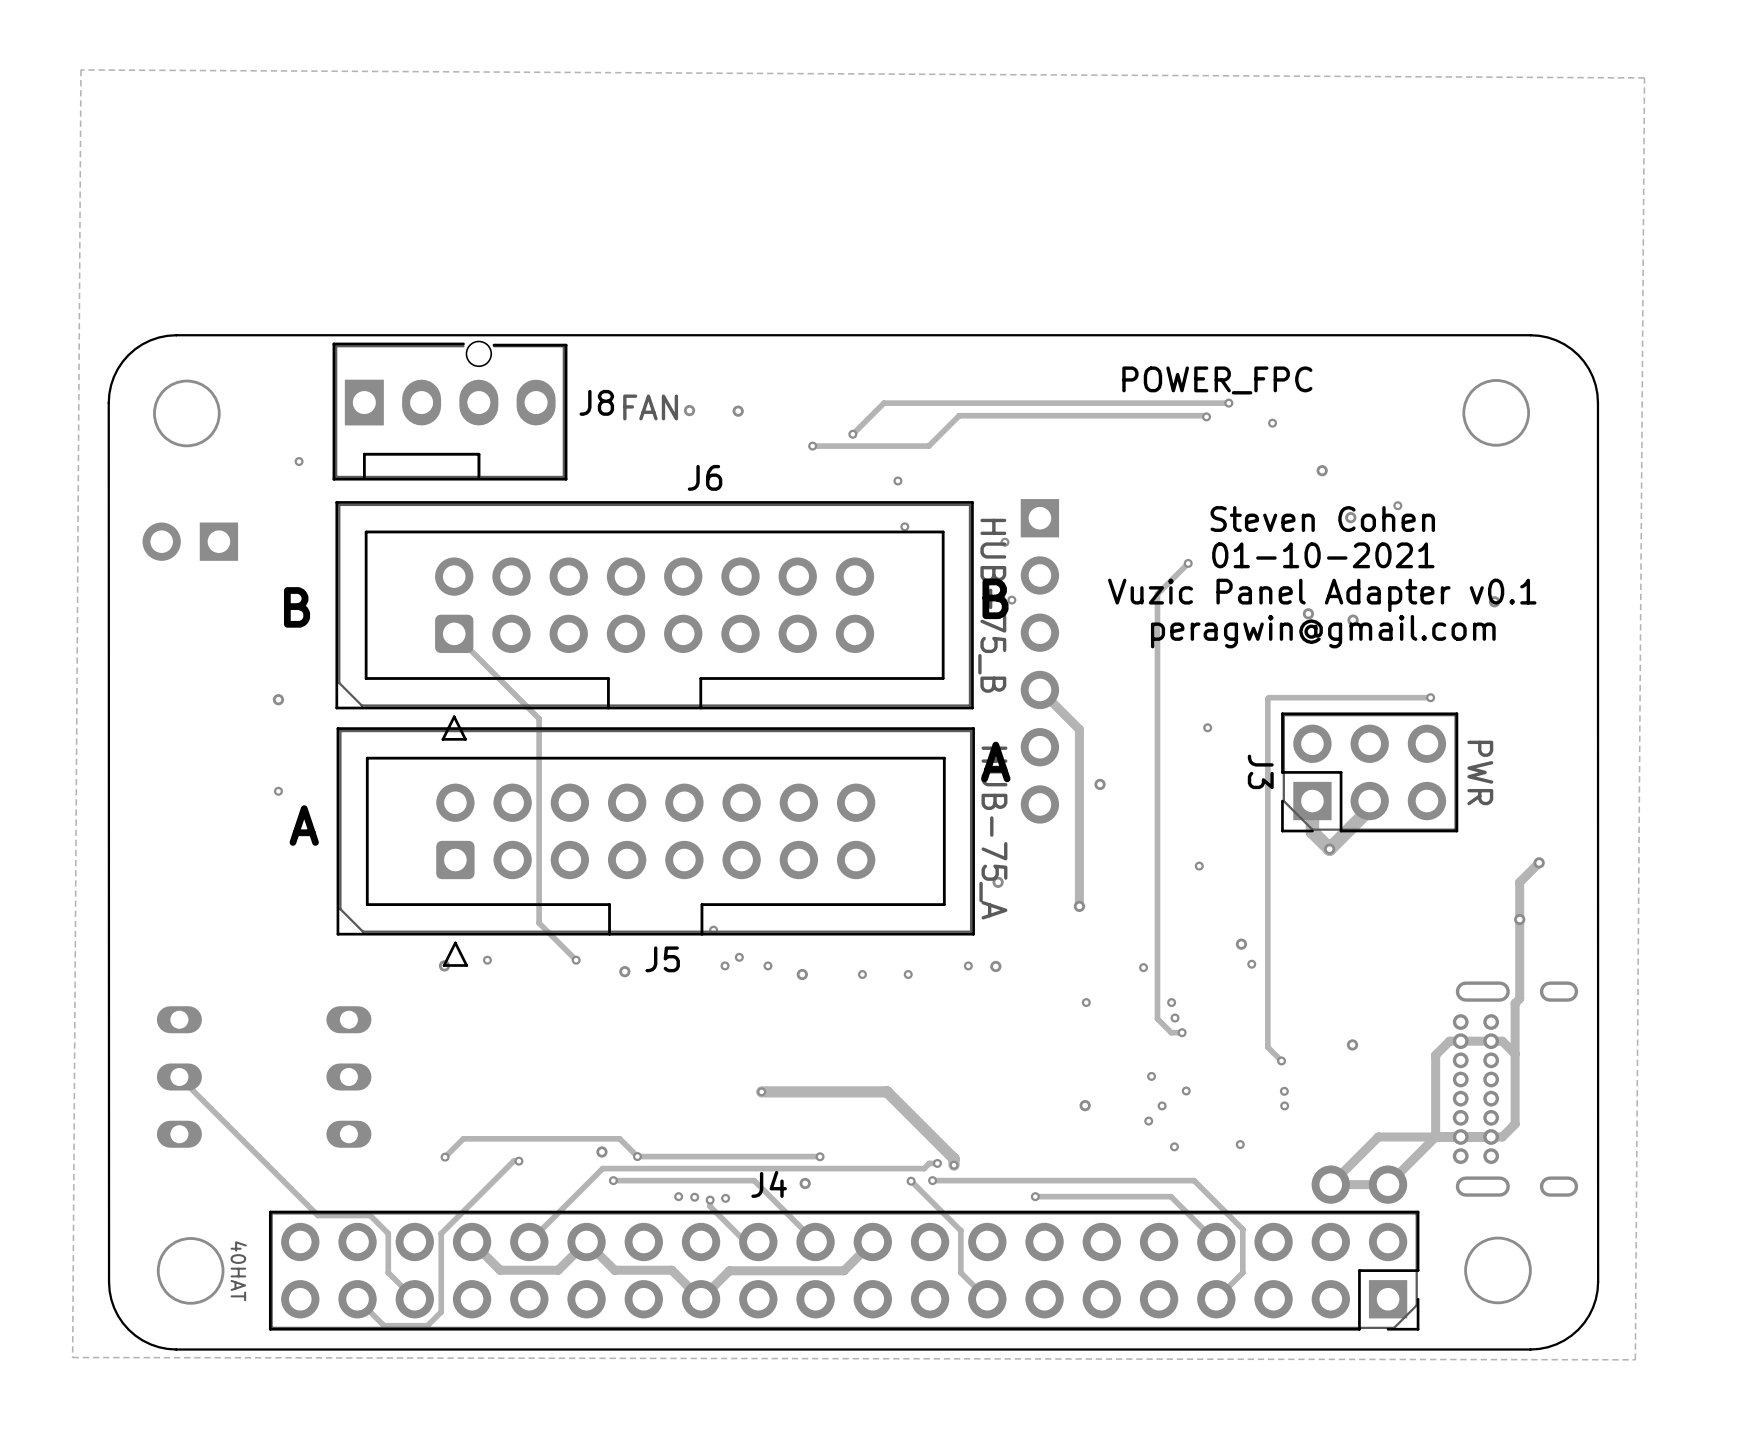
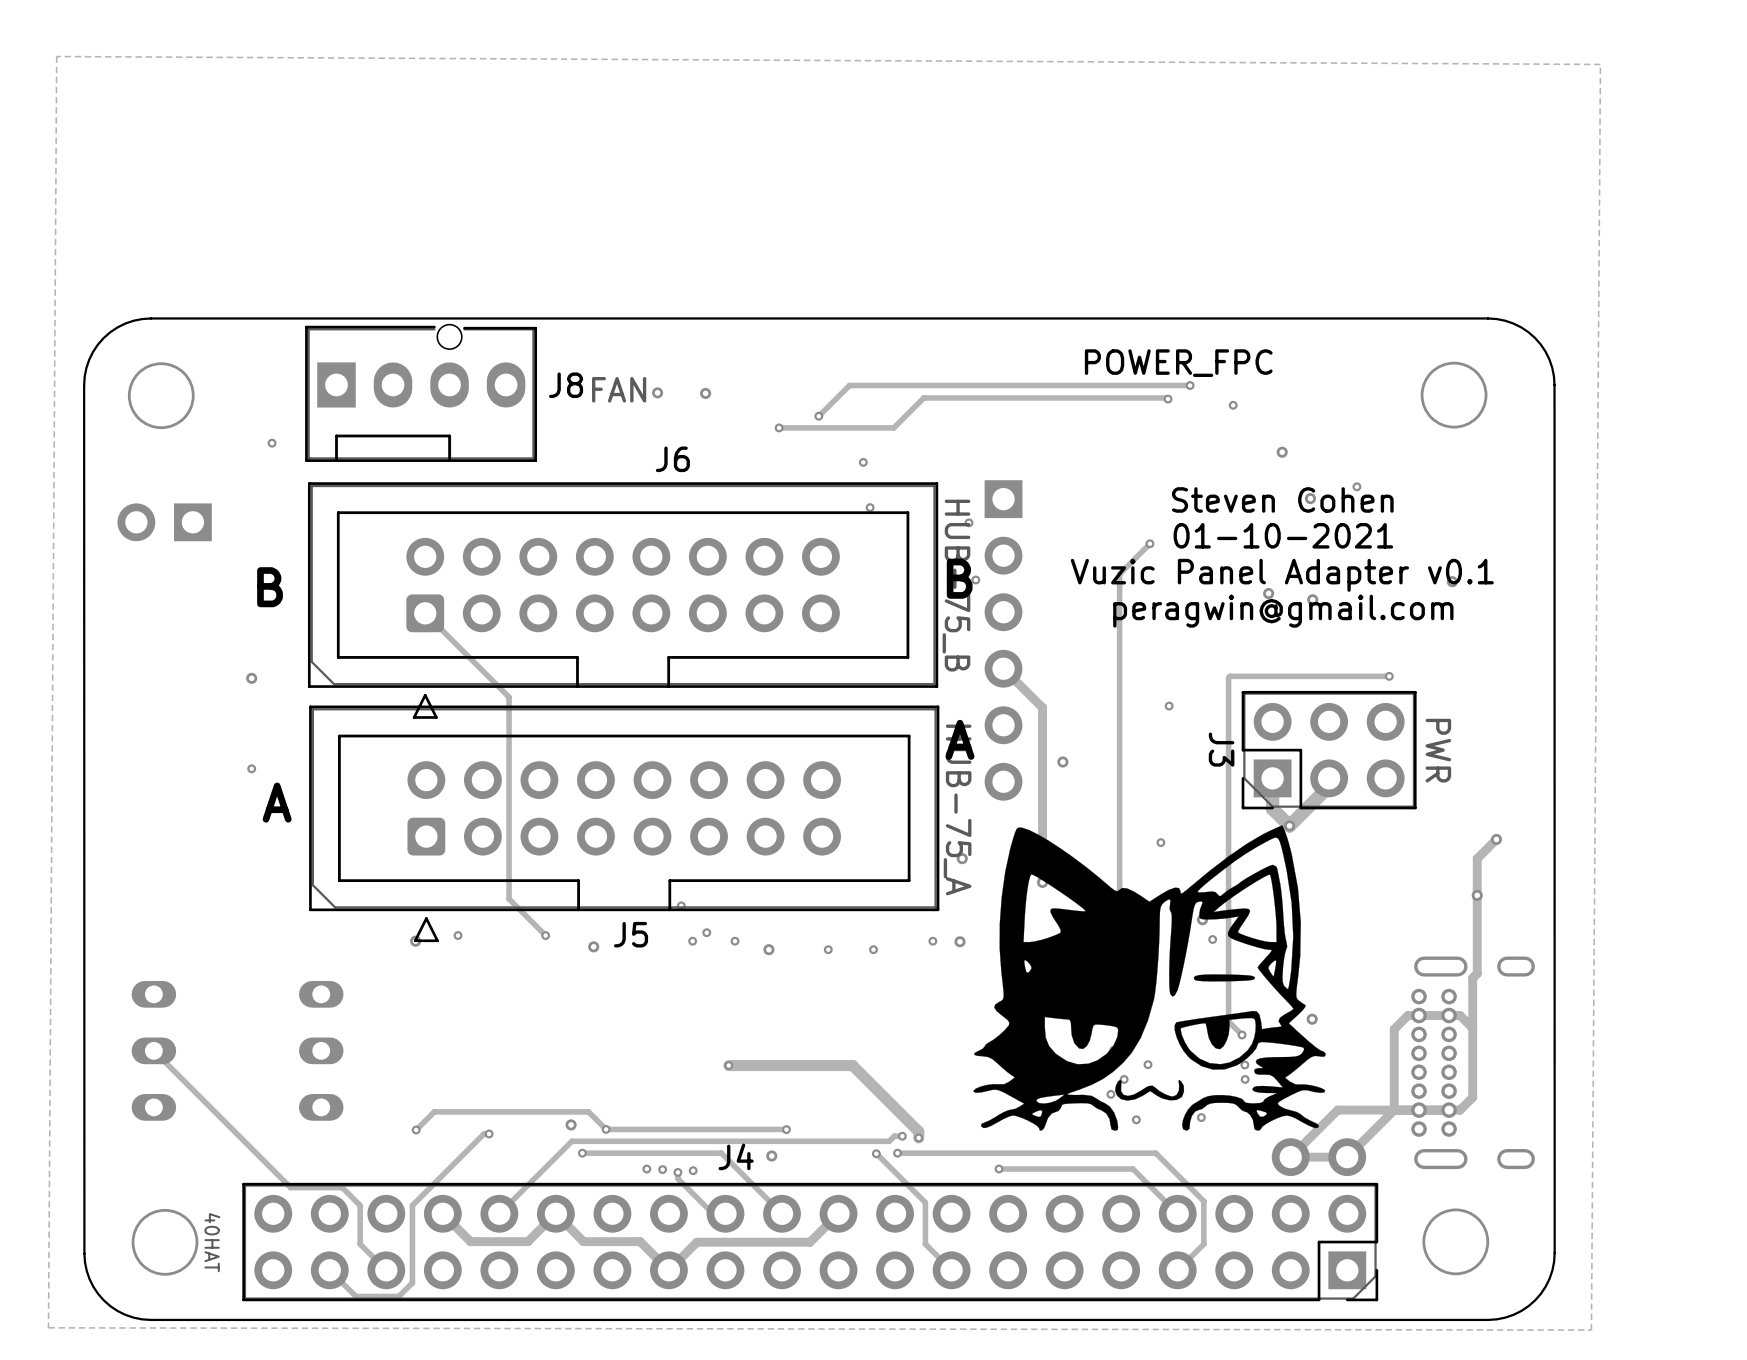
drawing: none -> [973, 825, 1326, 1131]

